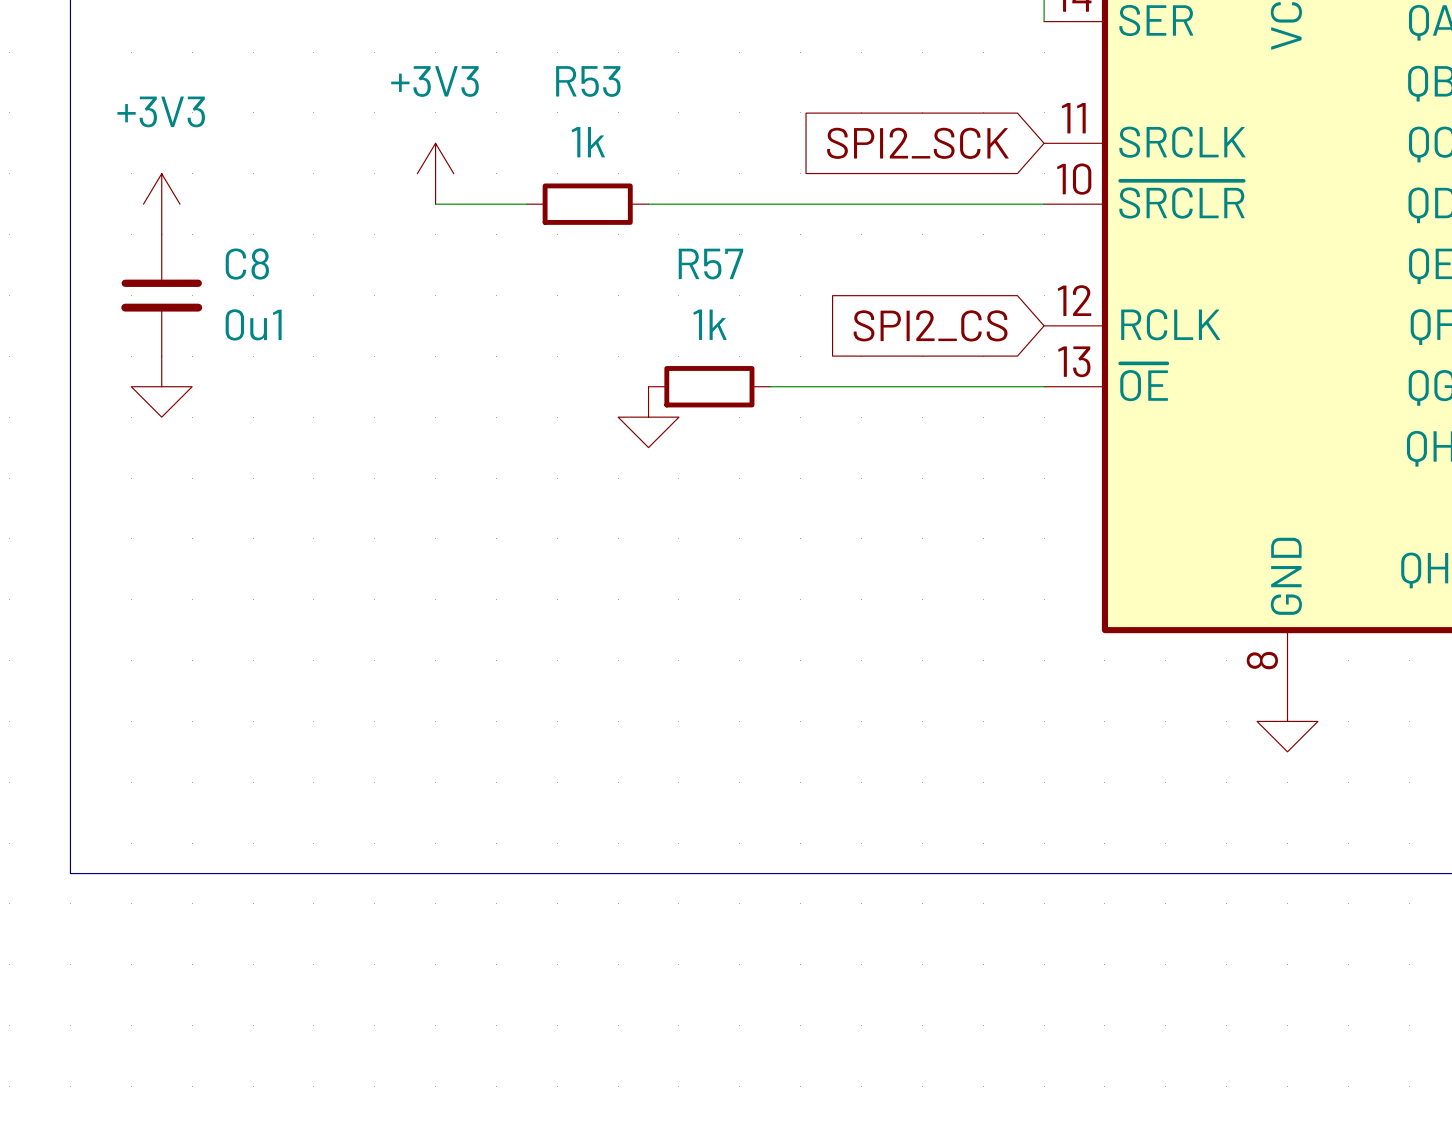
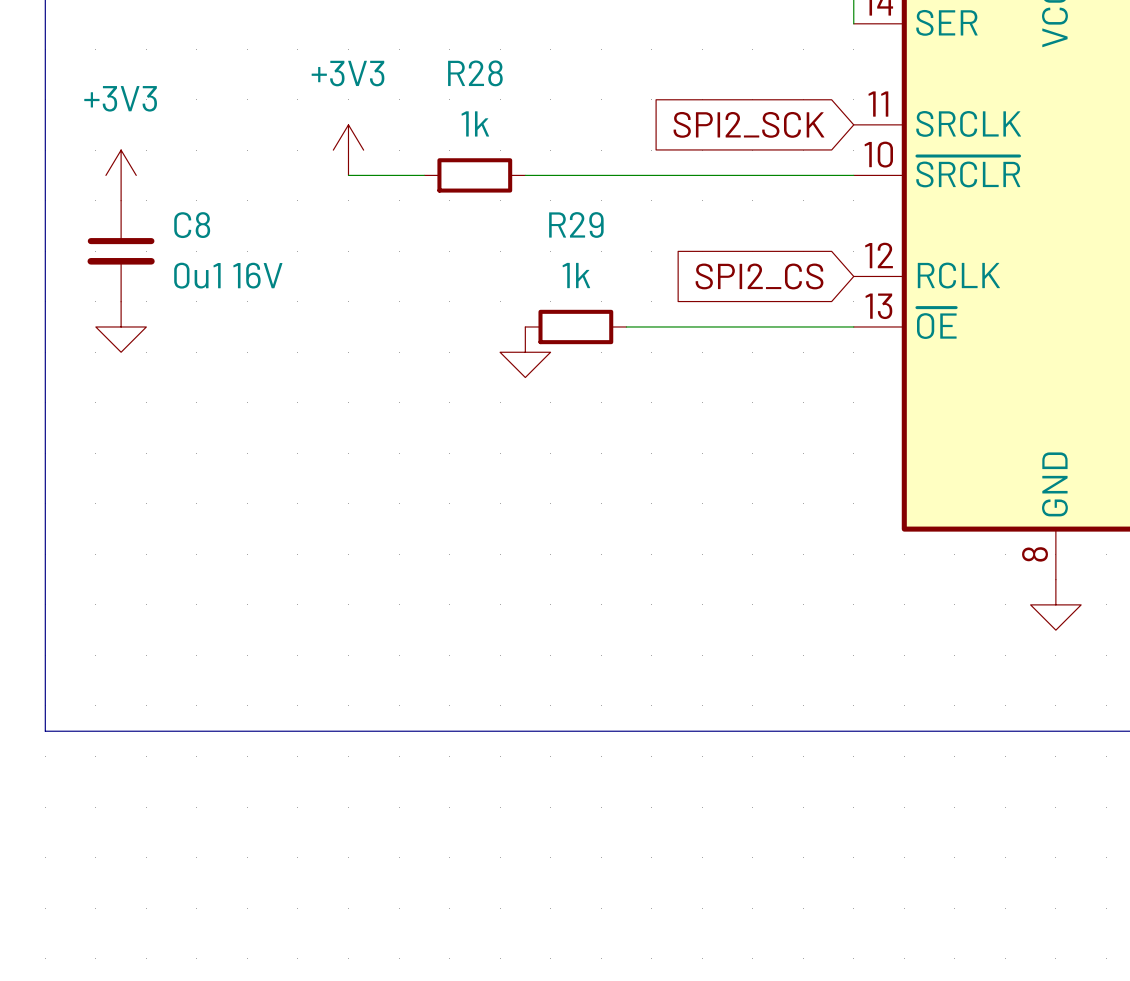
R53 name: R53 (588, 81) -> R28 (475, 73)
R57 name: R57 (710, 264) -> R29 (576, 224)
C8 value: 0u1 (253, 324) -> 0u1 16V (228, 275)

